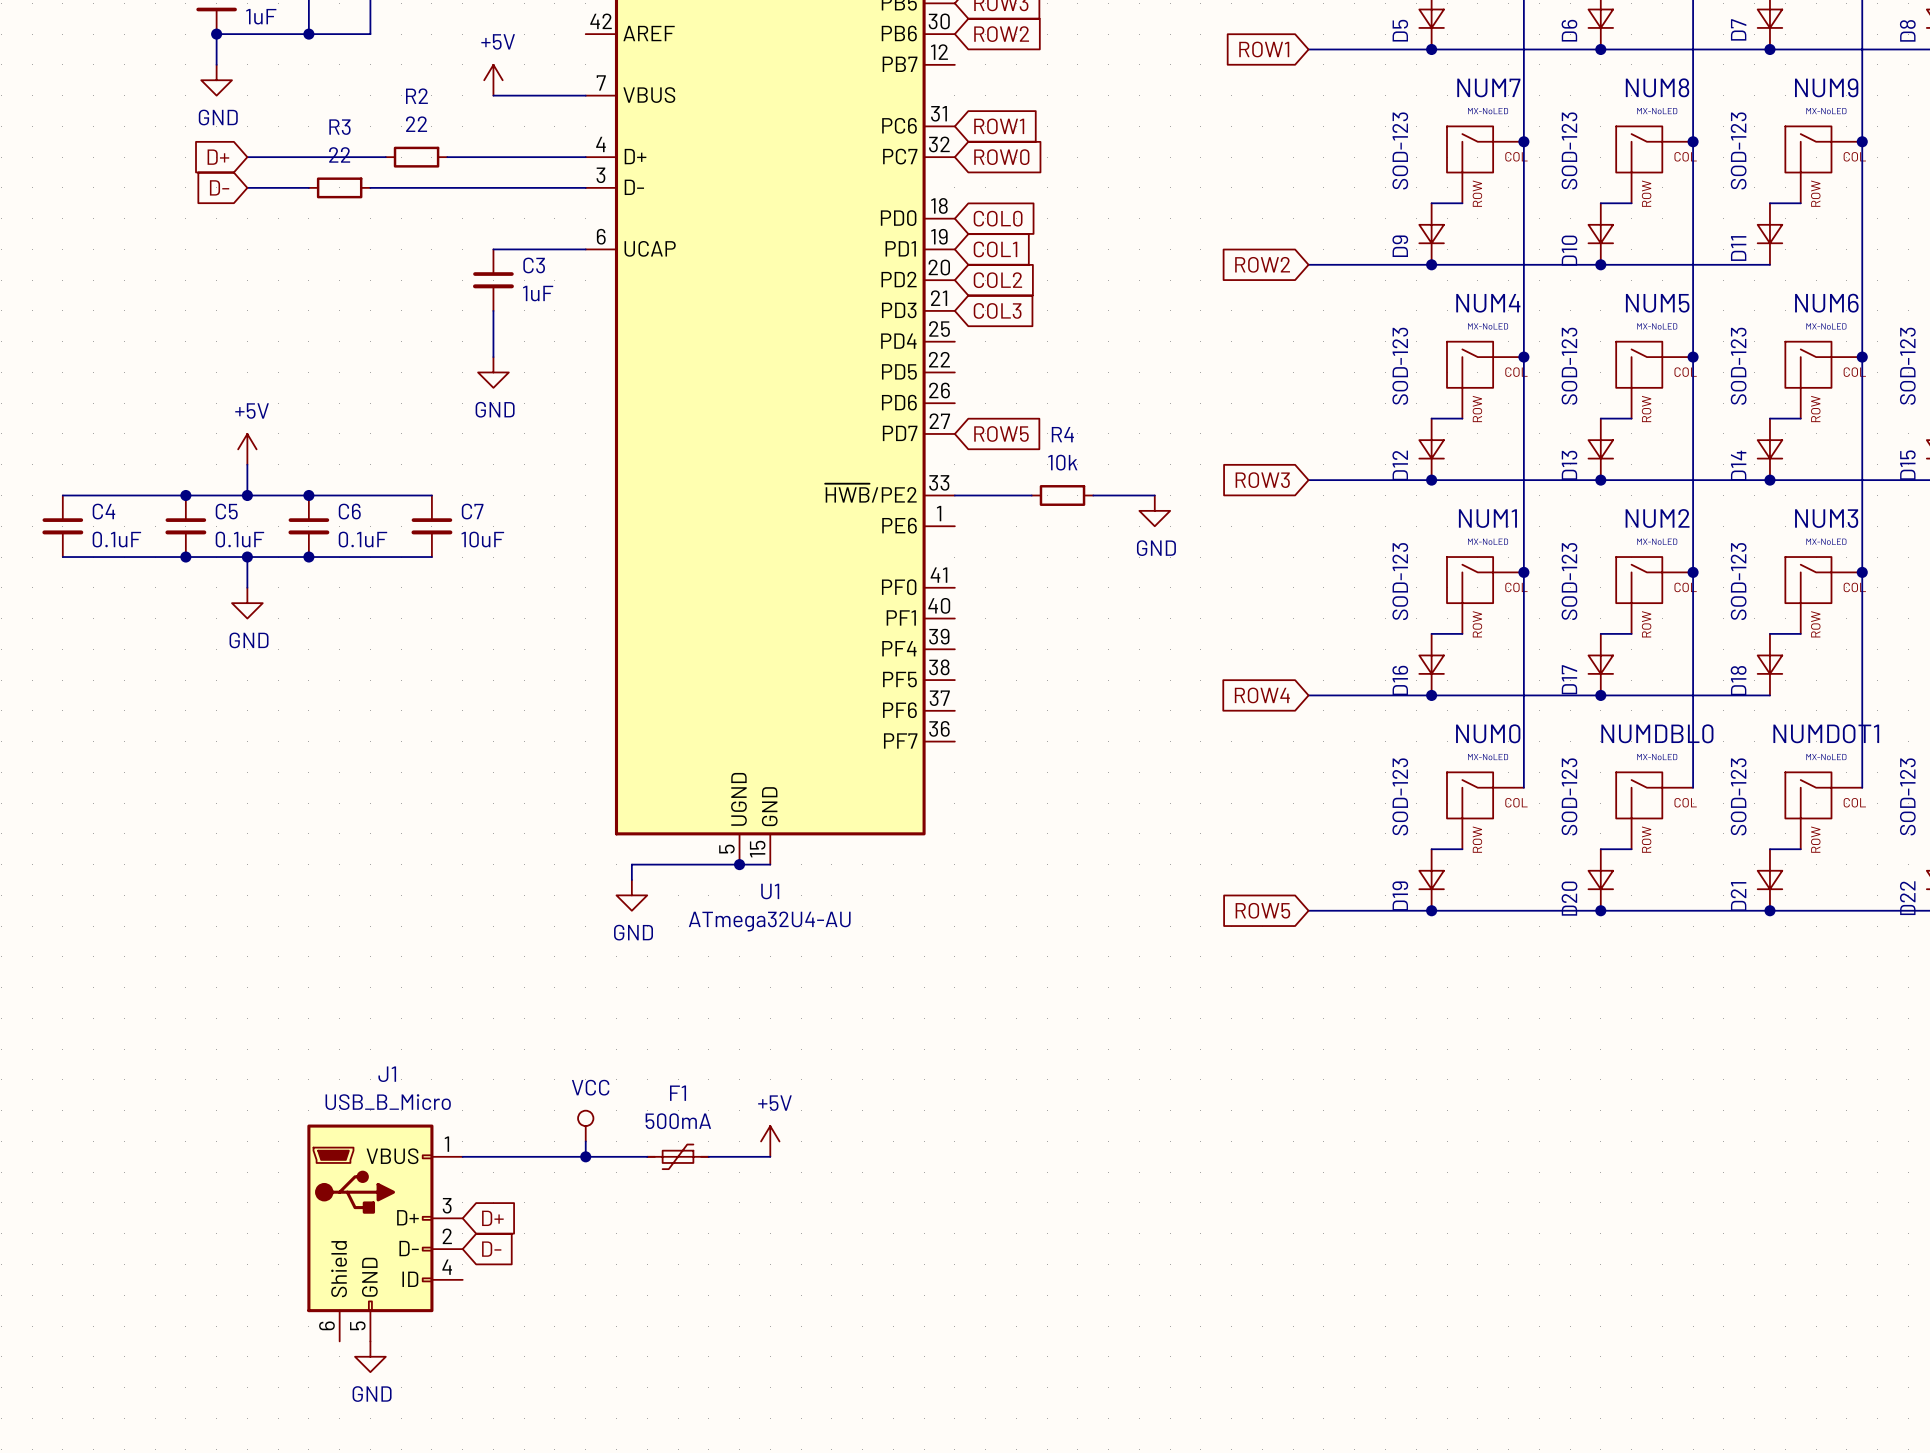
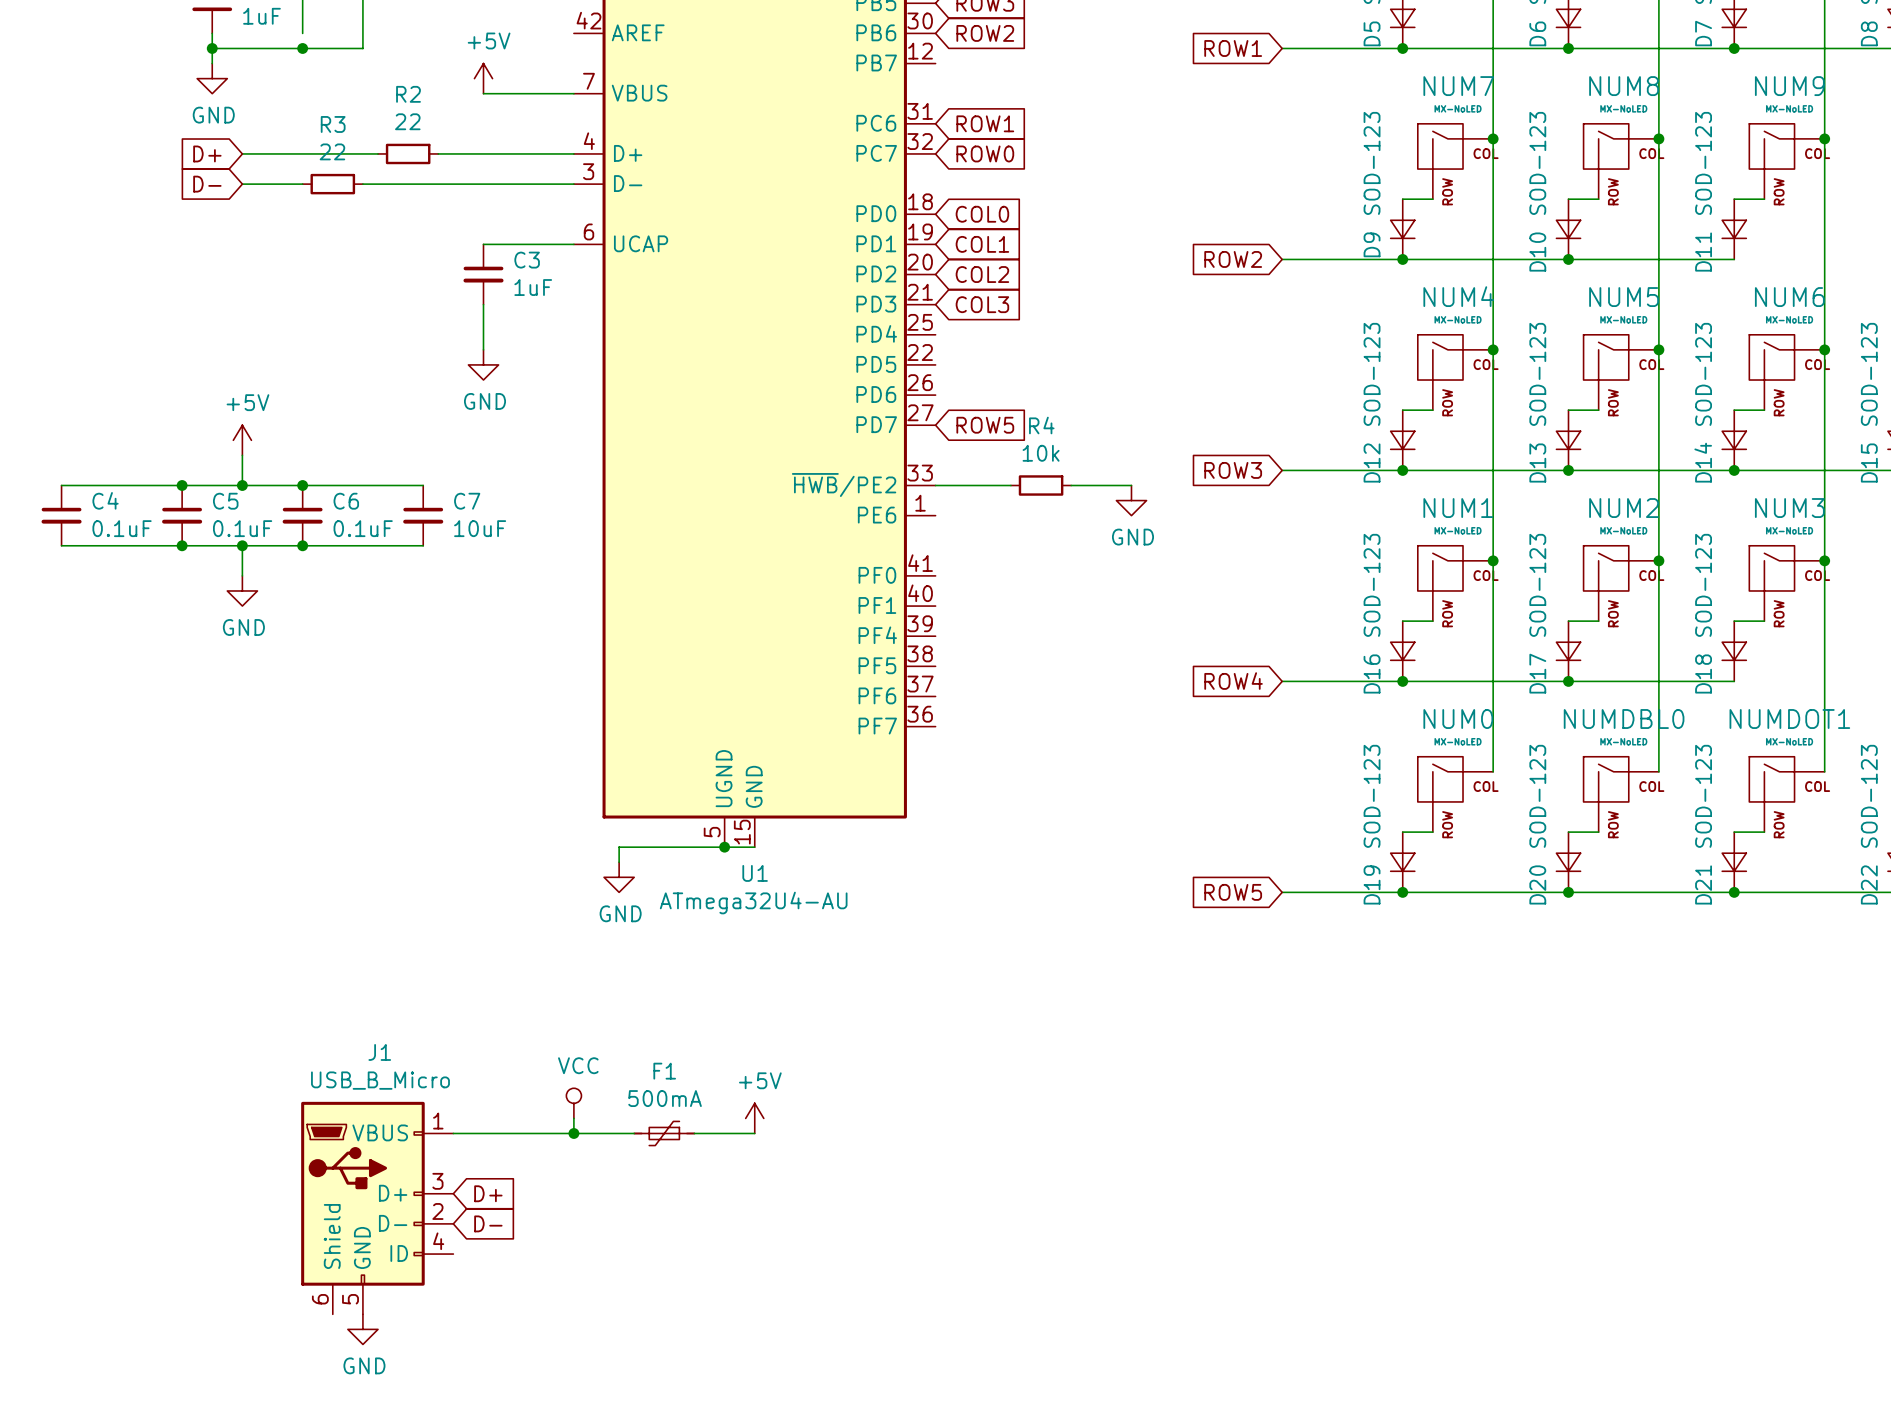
wire: (216, 34) (370, 34) -> (212, 48) (362, 48) (362, 33)
junction position: (216, 34) -> (212, 48)
junction position: (308, 34) -> (302, 48)

